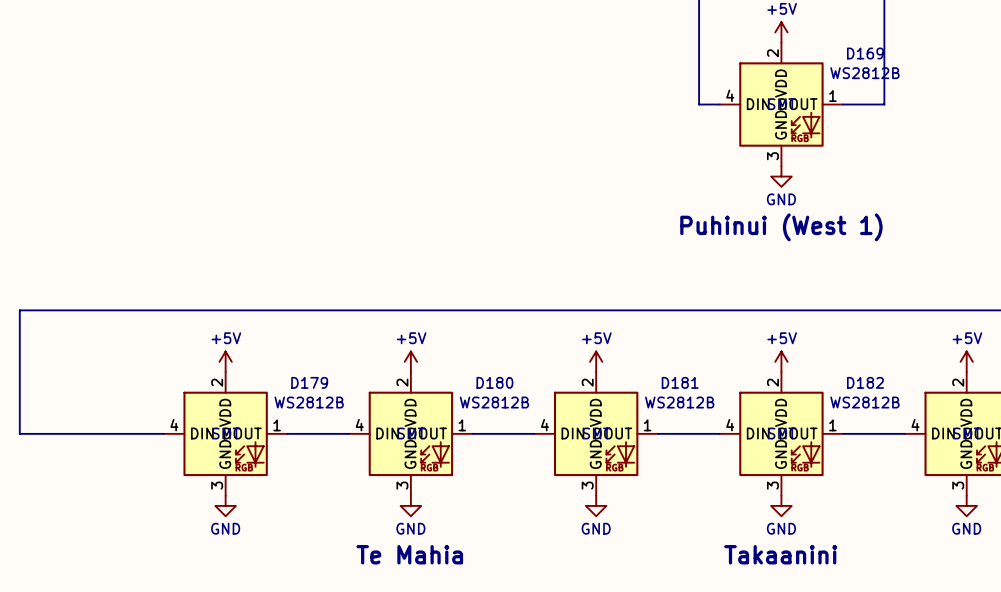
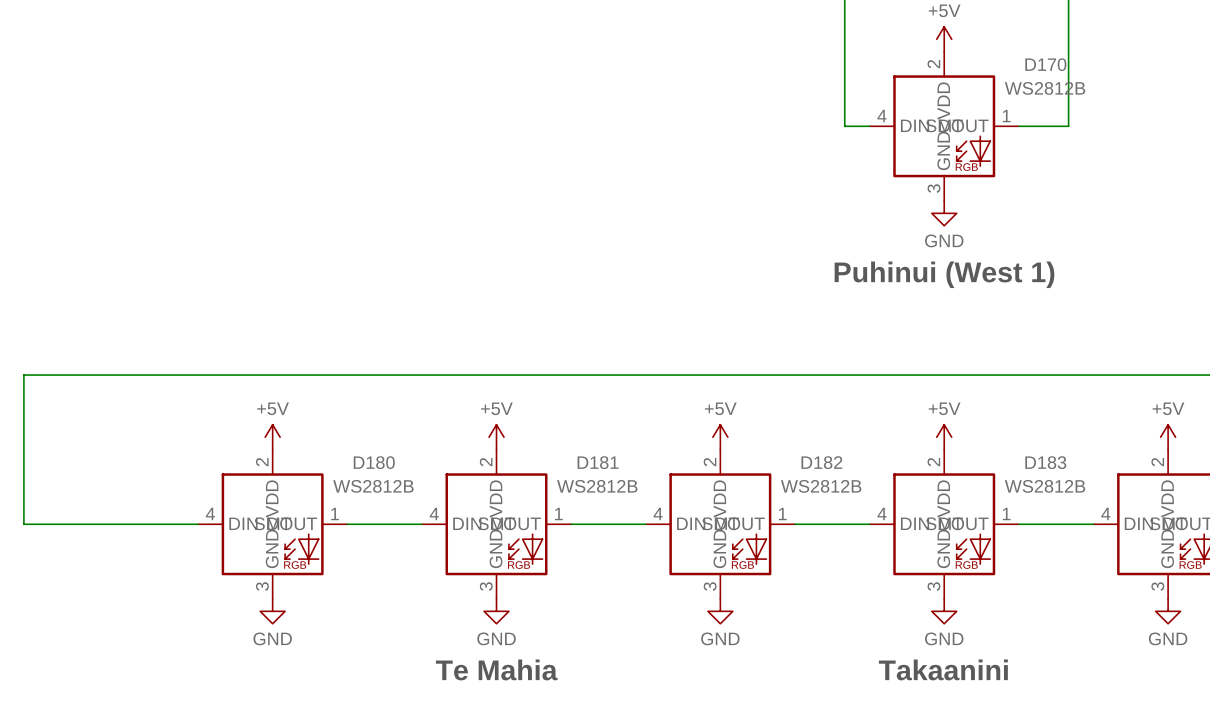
D169 name: D169 (865, 53) -> D170 (1045, 64)
D179 name: D179 (309, 382) -> D180 (374, 462)
D180 name: D180 (494, 382) -> D181 (598, 462)
D181 name: D181 (680, 382) -> D182 (821, 462)
D182 name: D182 (865, 382) -> D183 (1045, 462)

